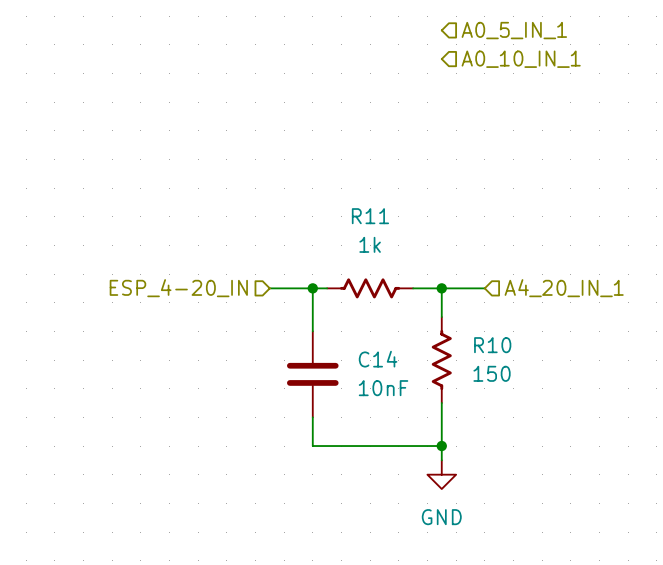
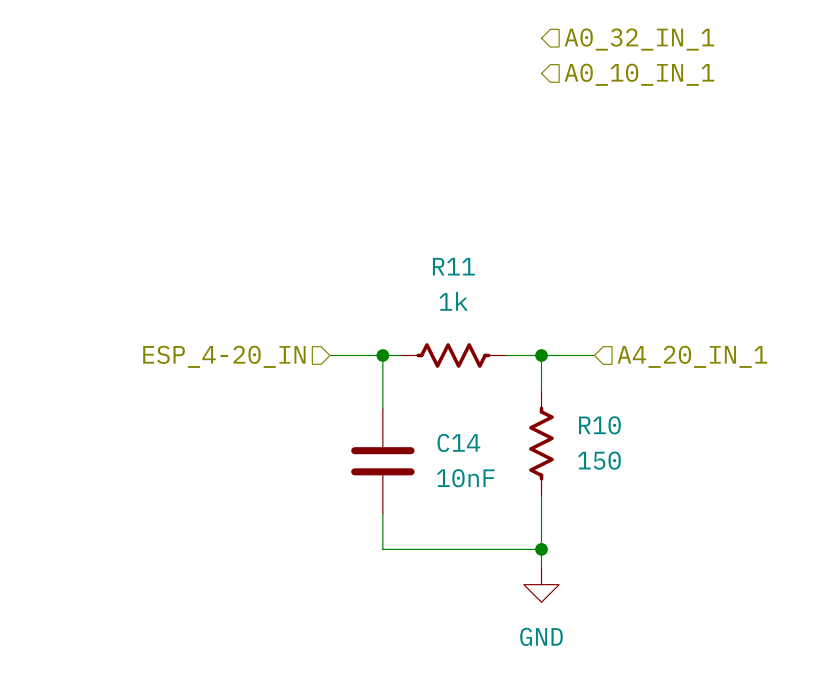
hierarchical label: A0_5_IN_1 (514, 30) -> A0_32_IN_1 (639, 39)

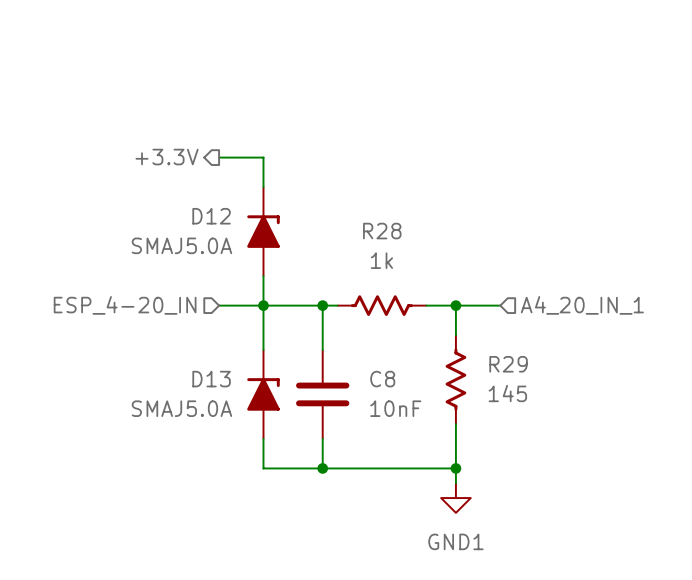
hierarchical label: A0_32_IN_1 (639, 39) -> none
hierarchical label: A0_10_IN_1 (639, 74) -> none
hierarchical label: none -> +3.3V (167, 157)
wire: none -> (219, 157) (263, 157) (263, 187)
R11 name: R11 (453, 266) -> R28 (382, 231)
D12: none -> SMAJ5.0A (263, 231)
wire: none -> (263, 276) (263, 350)
wire: none -> (219, 305) (278, 305)
junction: none -> (263, 305)
hierarchical label position: ESP_4-20_IN (224, 356) -> ESP_4-20_IN (125, 305)
R10 name: R10 (599, 425) -> R29 (508, 364)
C14 name: C14 (458, 442) -> C8 (382, 379)
R10 value: 150 (599, 460) -> 145 (507, 393)
D13: none -> SMAJ5.0A (263, 394)
wire: none -> (263, 438) (263, 468) (322, 468)
junction: none -> (322, 468)
power symbol: GND (541, 584) -> GND1 (455, 498)

